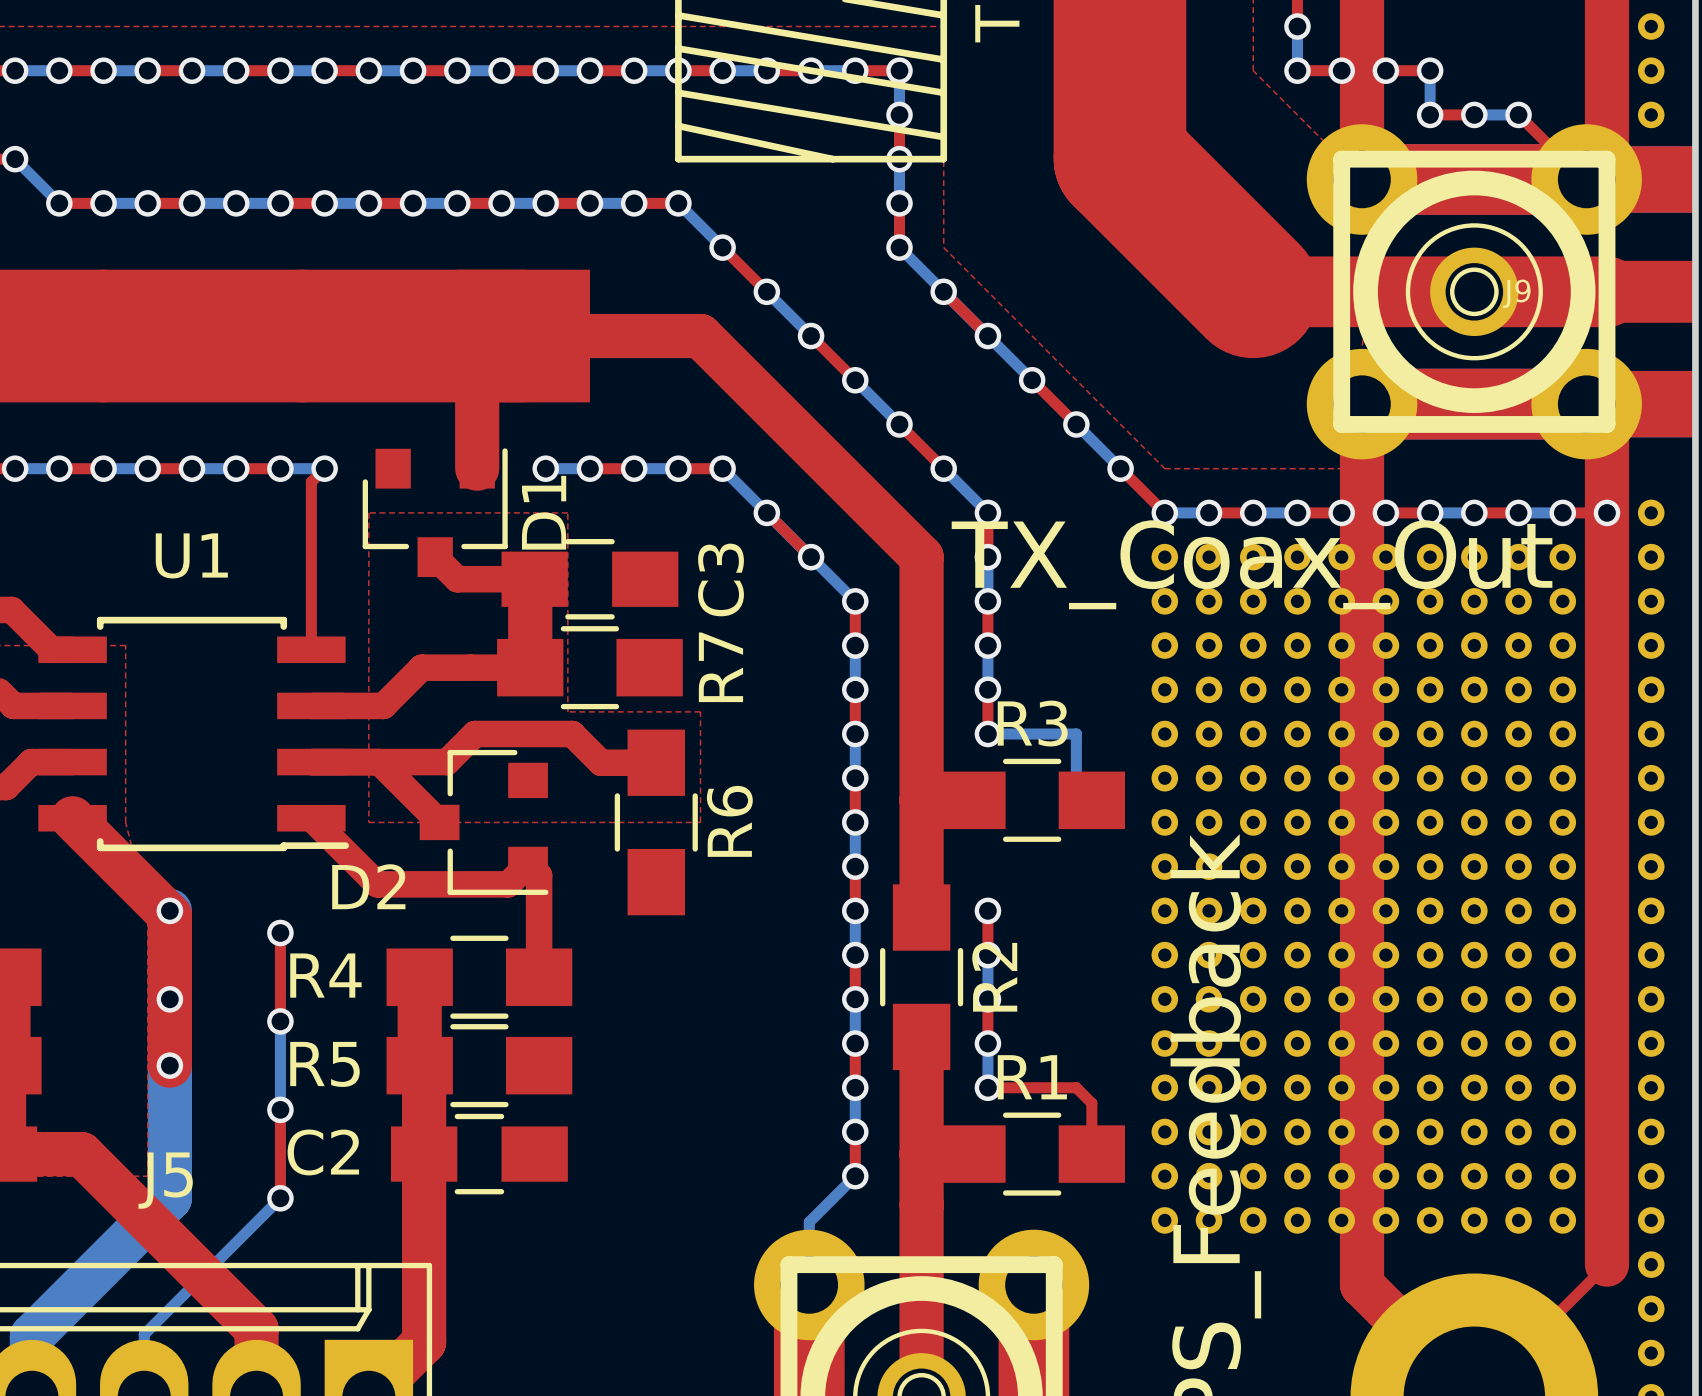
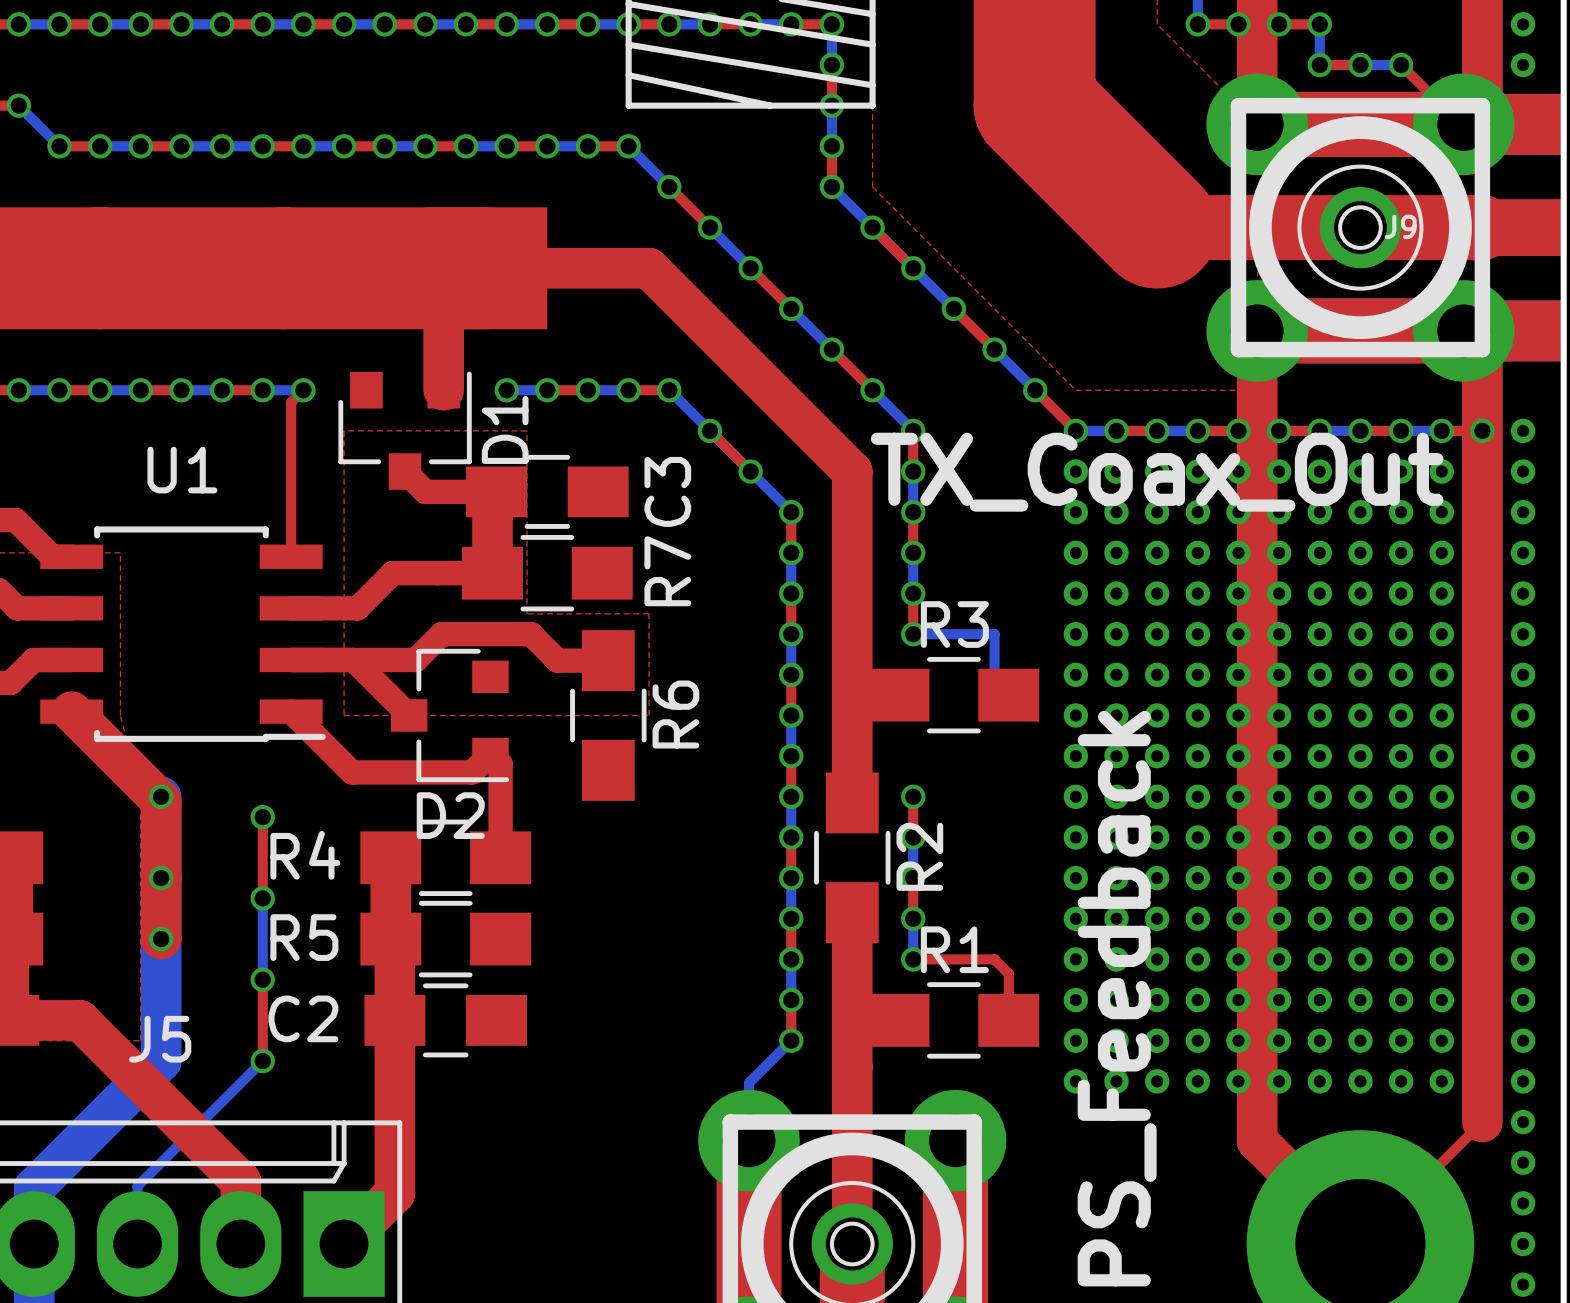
D2 name position: D2 (368, 886) -> D2 (450, 815)

